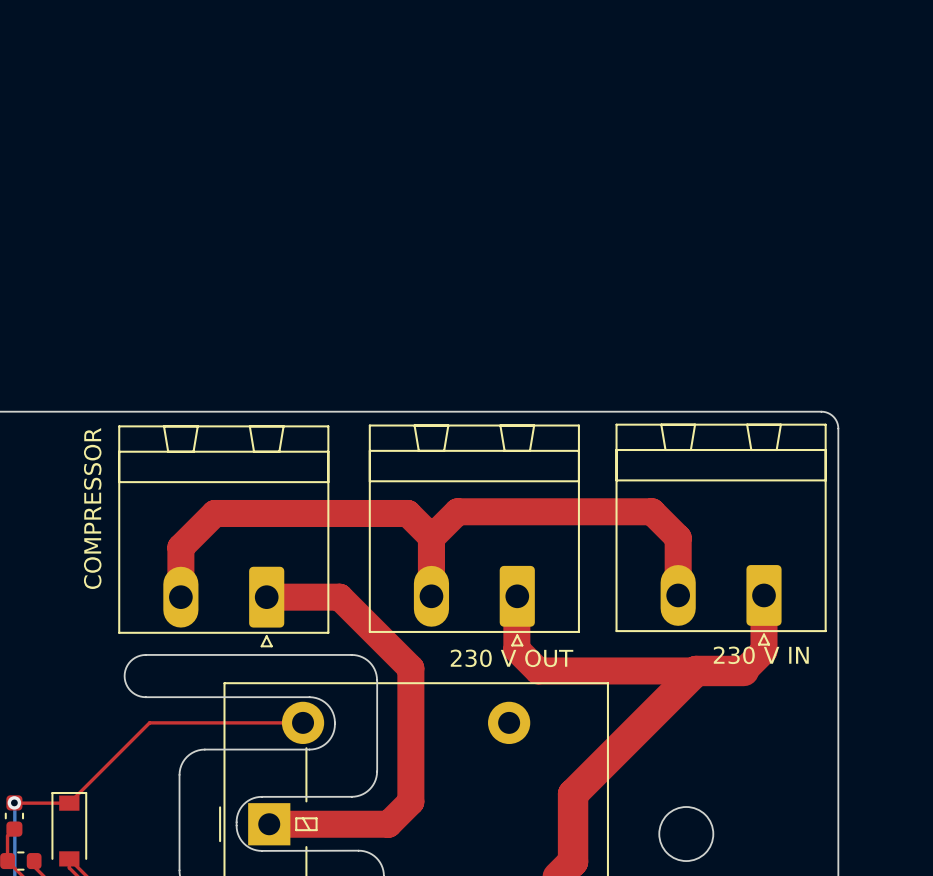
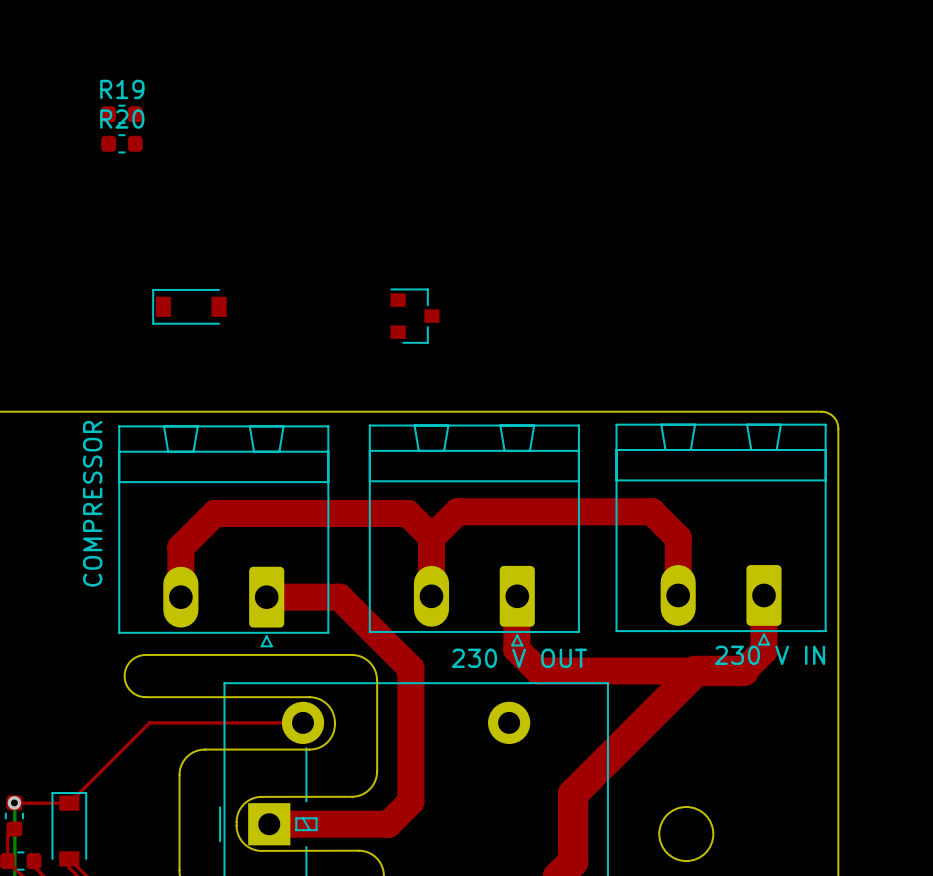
R19: none -> (121, 114)
R20: none -> (121, 143)
part: none -> (189, 306)
part: none -> (414, 316)

